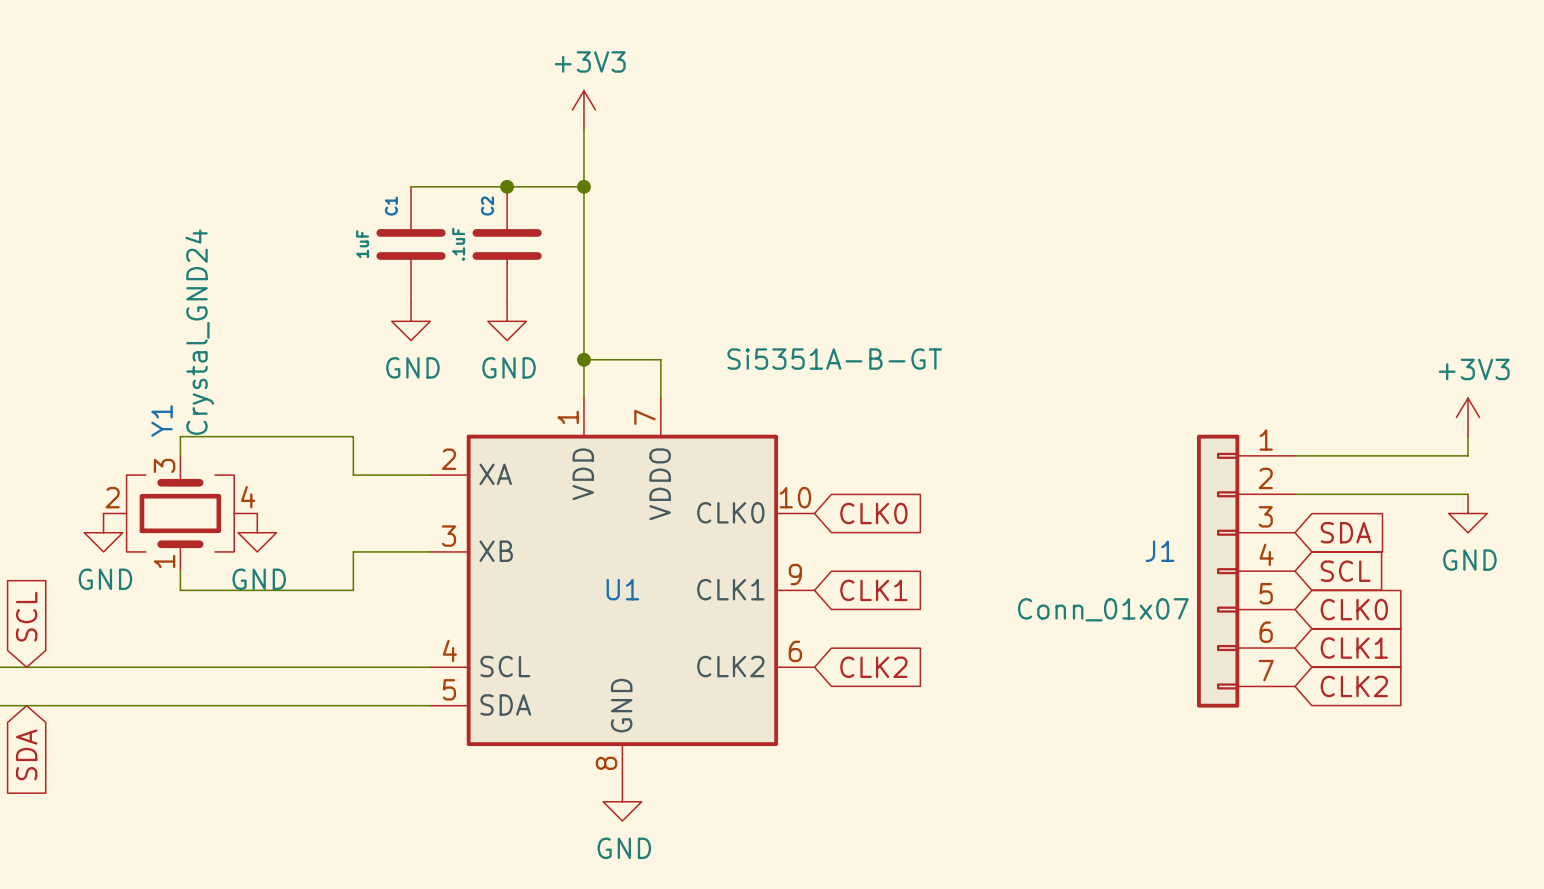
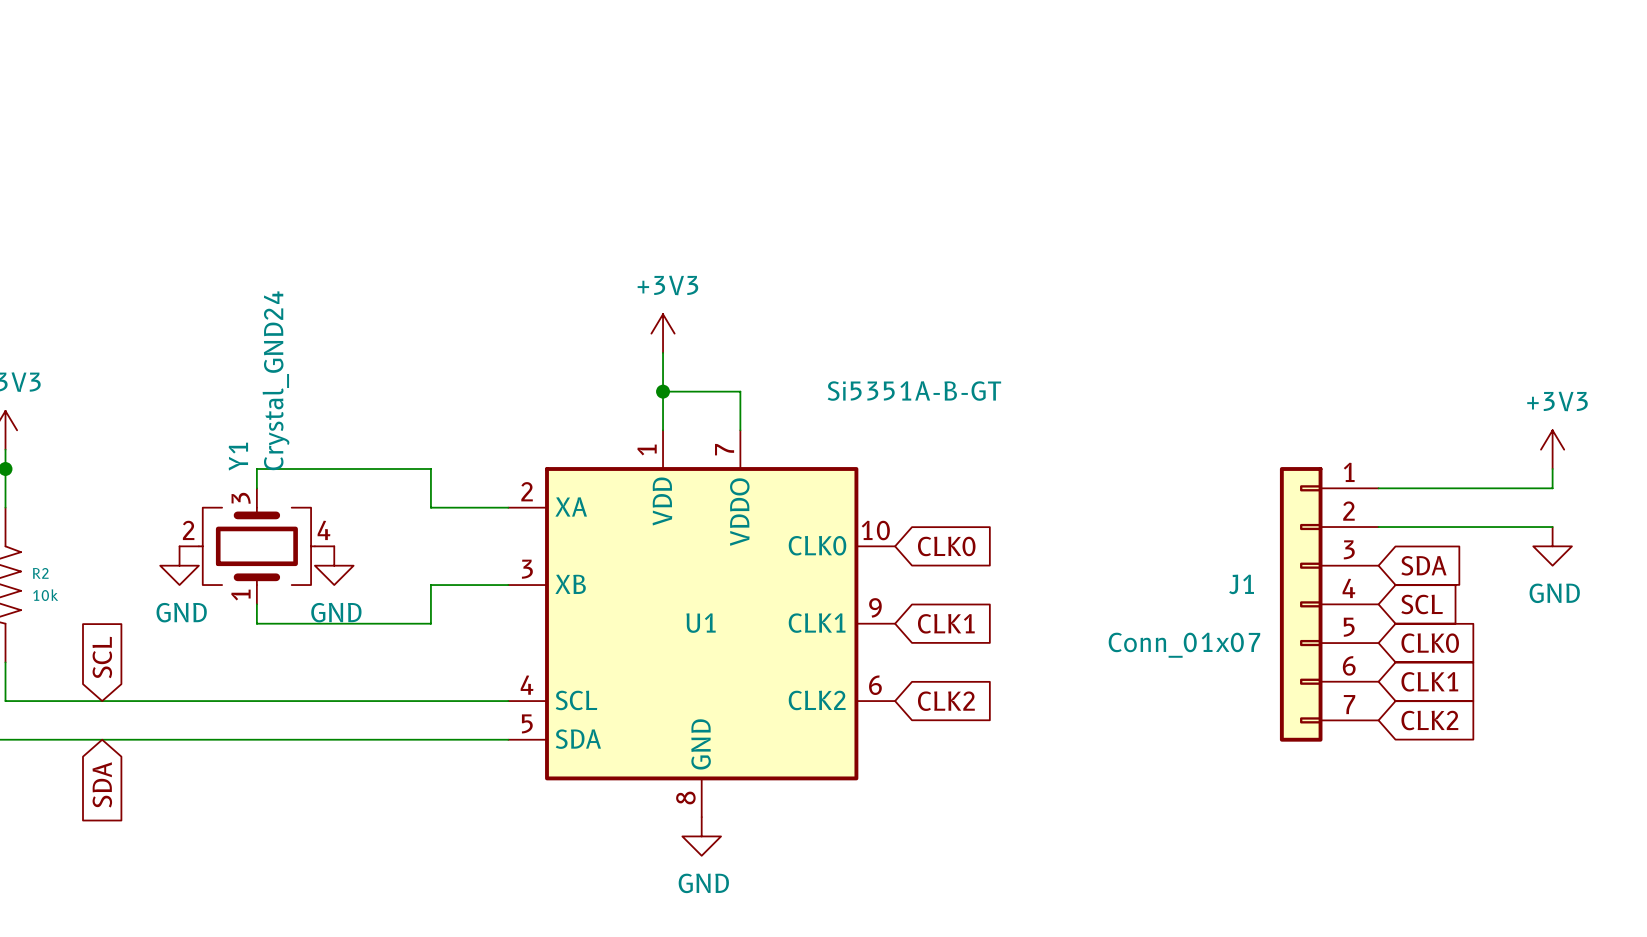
power symbol position: +3V3 (583, 109) -> +3V3 (663, 333)
wire: (583, 129) (583, 321) -> none
wire: (411, 186) (583, 186) -> none
junction: (507, 186) -> none
junction: (583, 186) -> none
C1: 1uF (411, 244) -> none
C2: .1uF (507, 244) -> none
power symbol: GND (411, 321) -> none
power symbol: GND (507, 321) -> none

